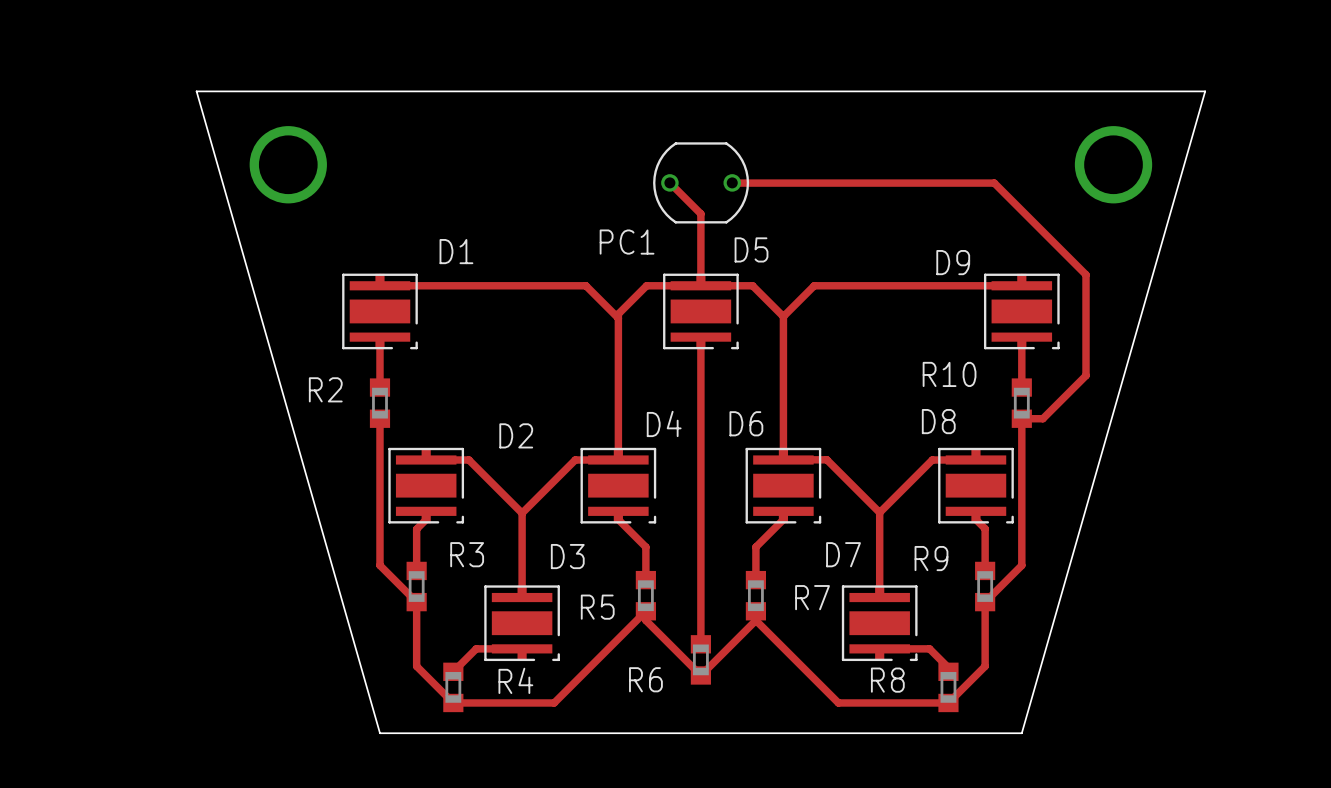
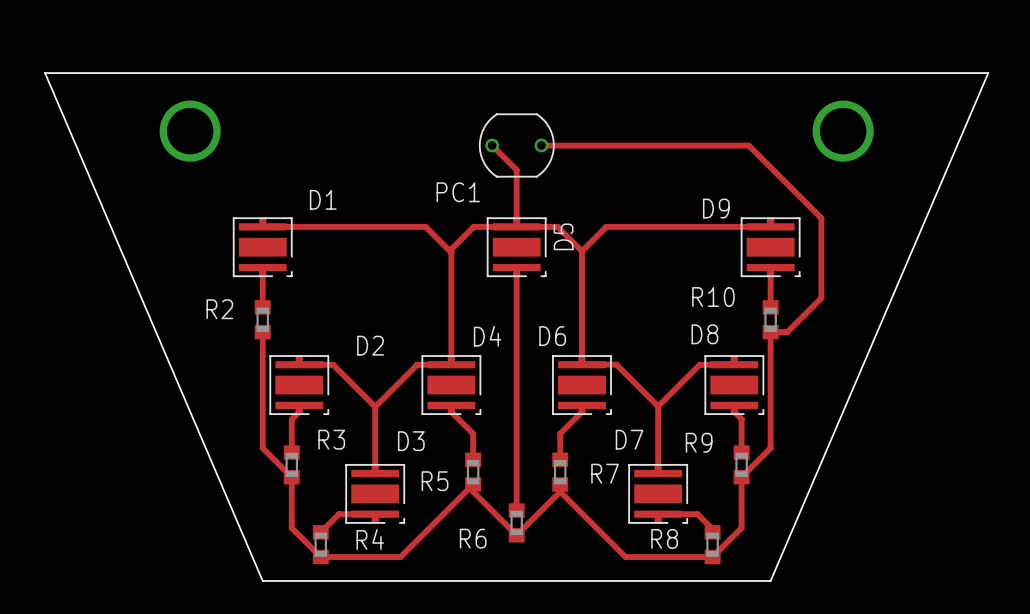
board edge: (196, 91) (379, 733) -> (117, 73) (45, 73) (262, 580)
board edge: (1205, 91) (1021, 733) -> (915, 73) (988, 73) (770, 580)
D5 name rotation: 0° (751, 249) -> 90° counterclockwise (563, 236)
D5 name position: D5 (751, 249) -> D5 (563, 236)

